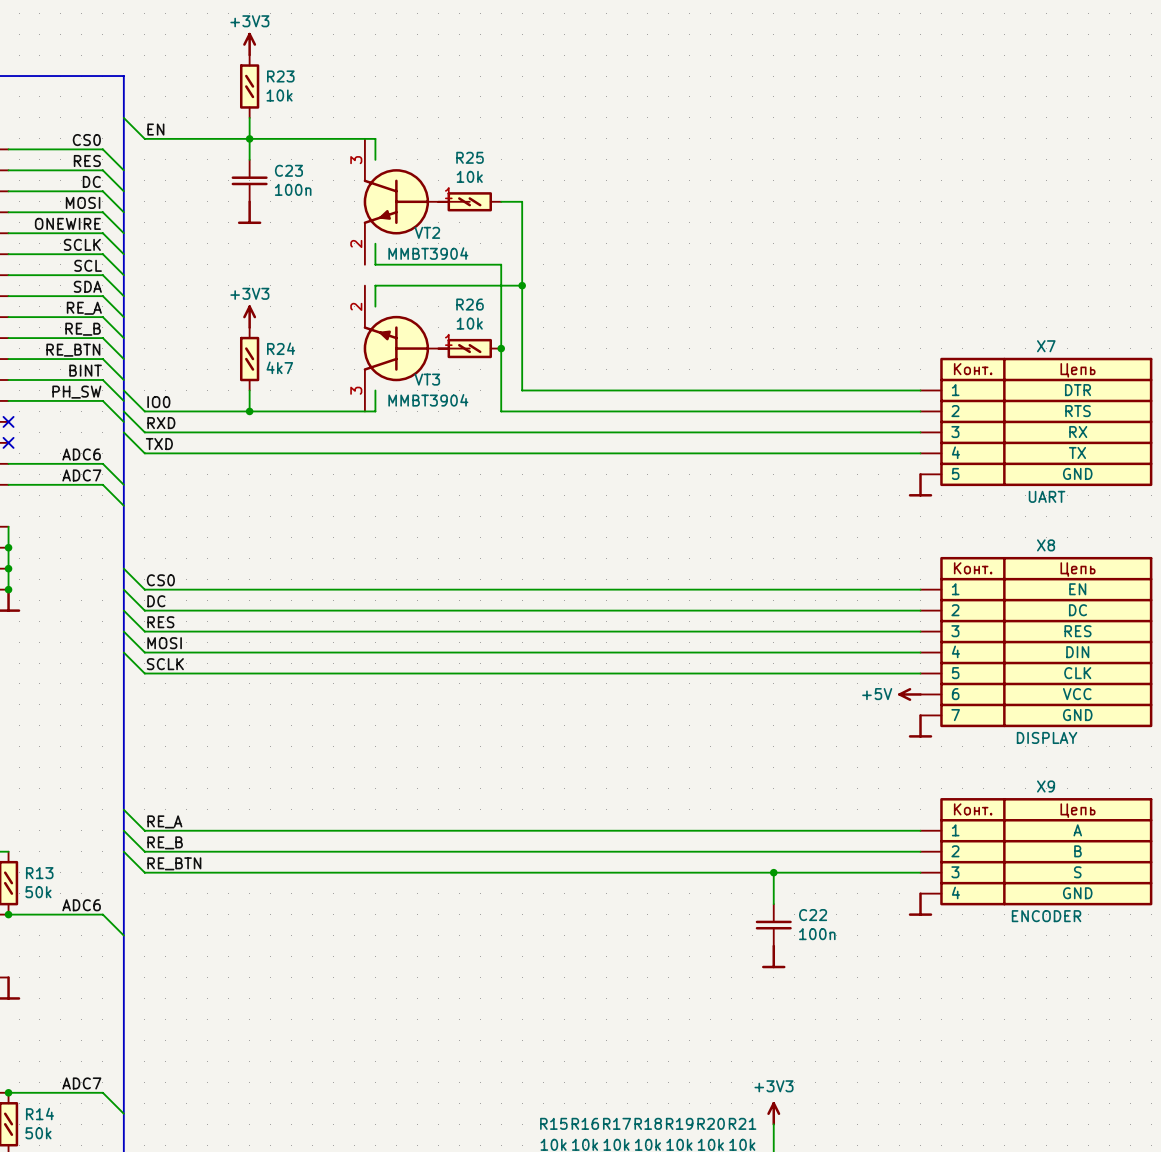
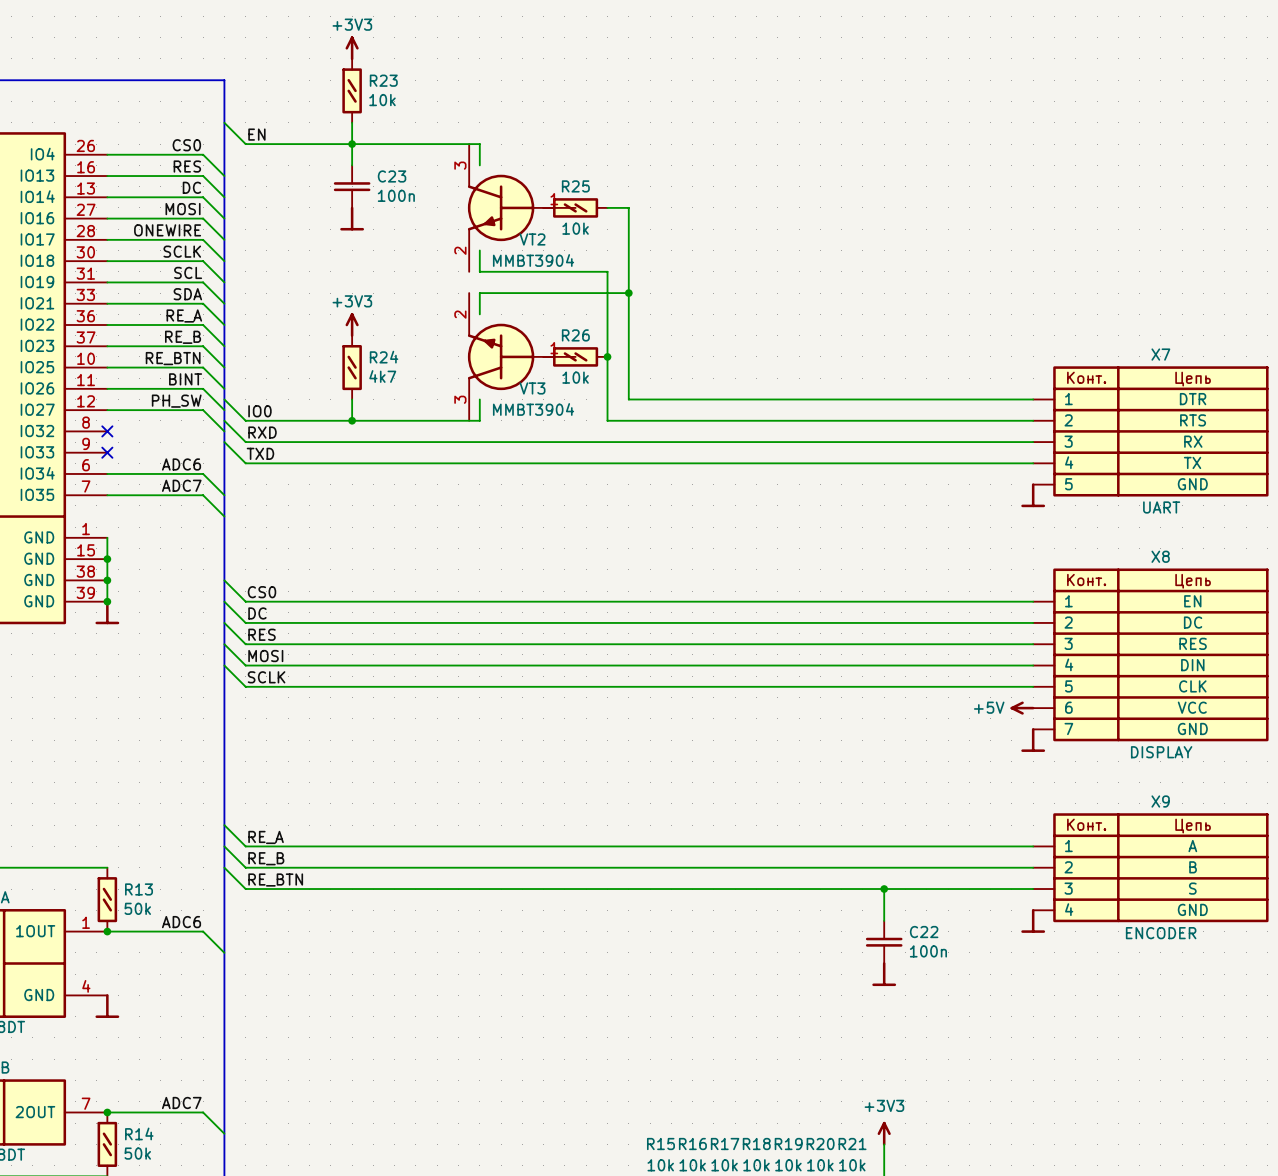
R25 name position: R25 (470, 157) -> R25 (575, 186)
R25 value position: 10k (469, 176) -> 10k (575, 228)
R26 name position: R26 (470, 304) -> R26 (575, 335)
R26 value position: 10k (469, 323) -> 10k (575, 377)

